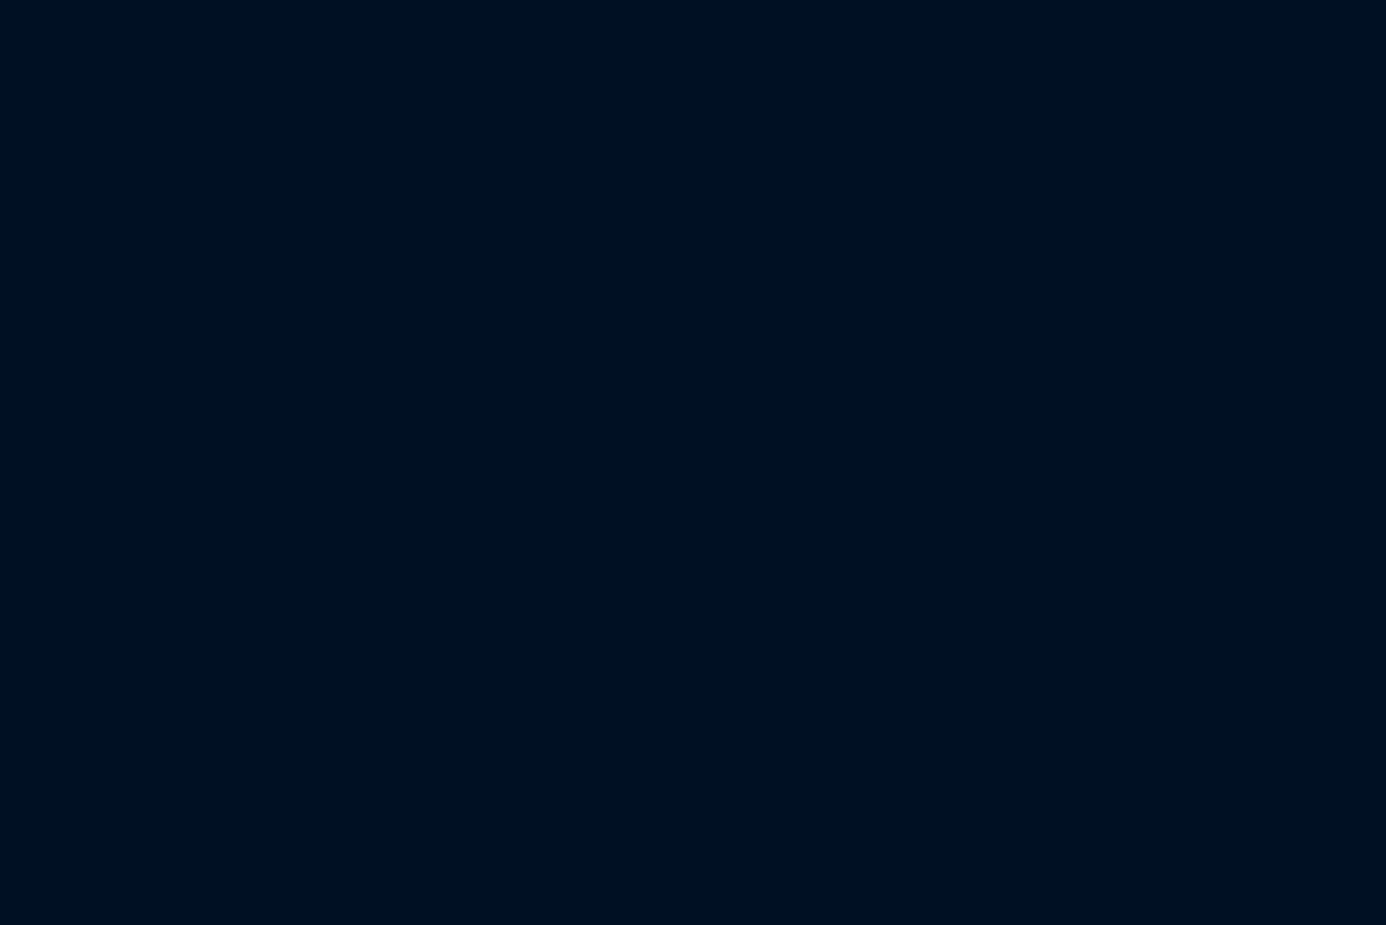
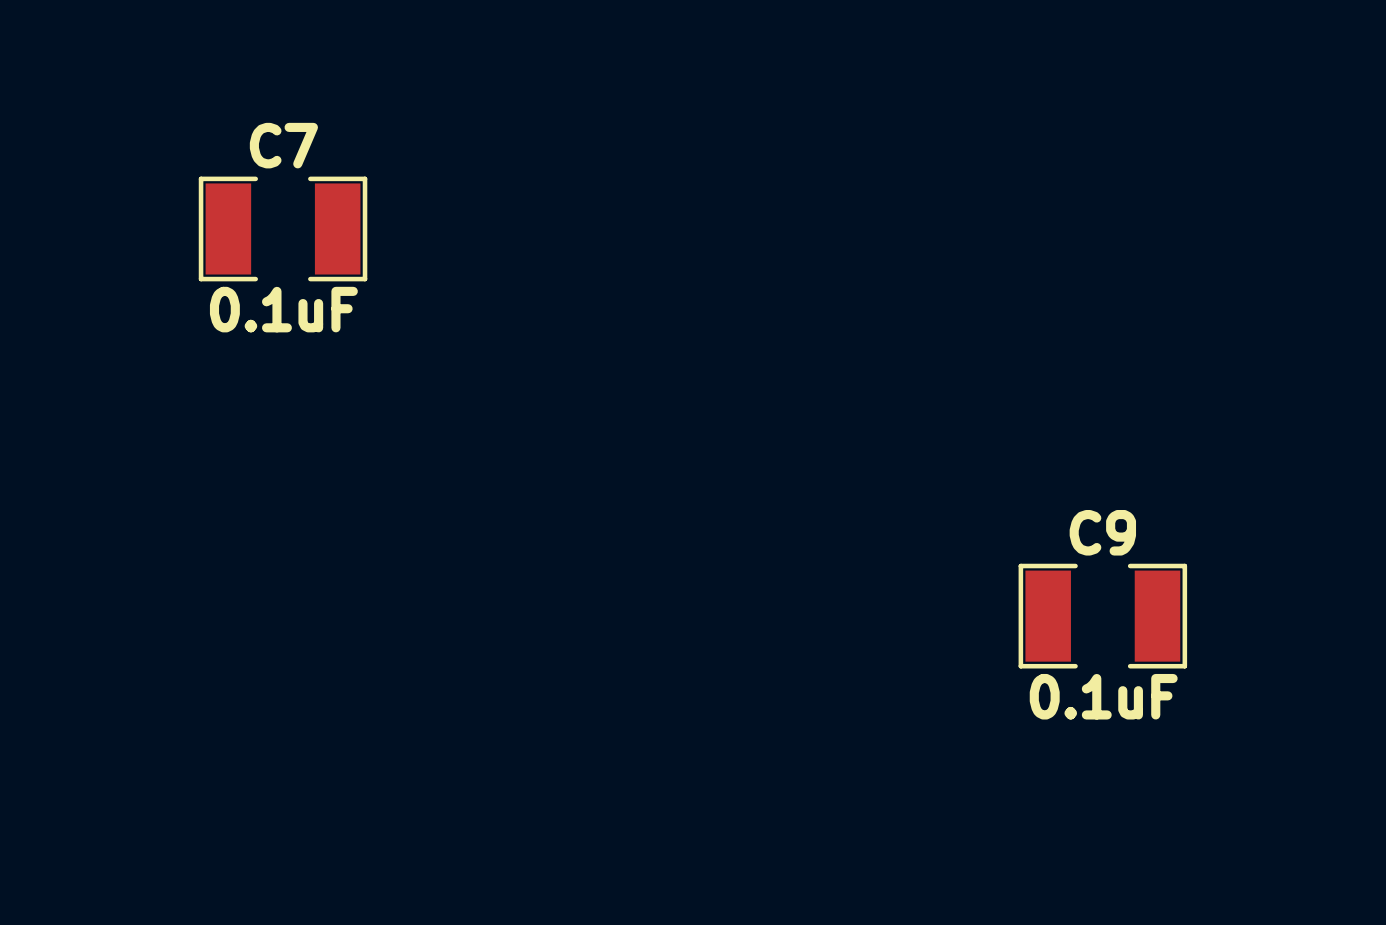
C7: none -> 0.1uF (283, 228)
C9: none -> 0.1uF (1102, 616)

